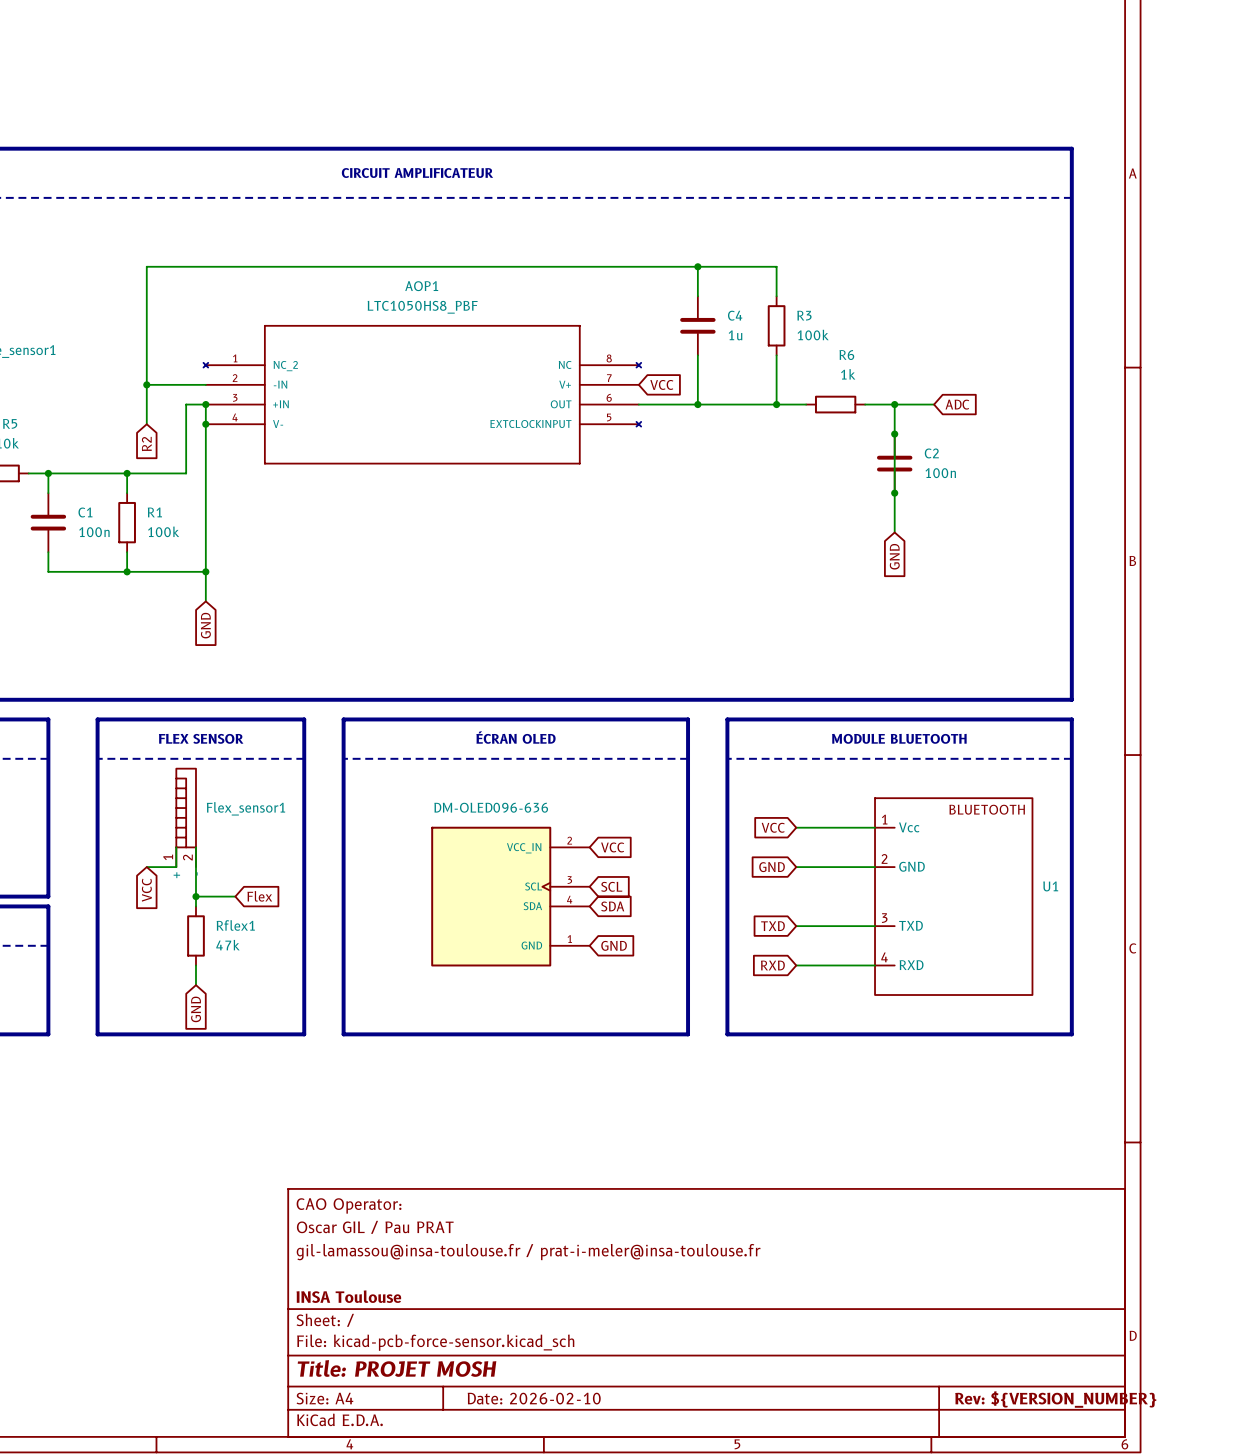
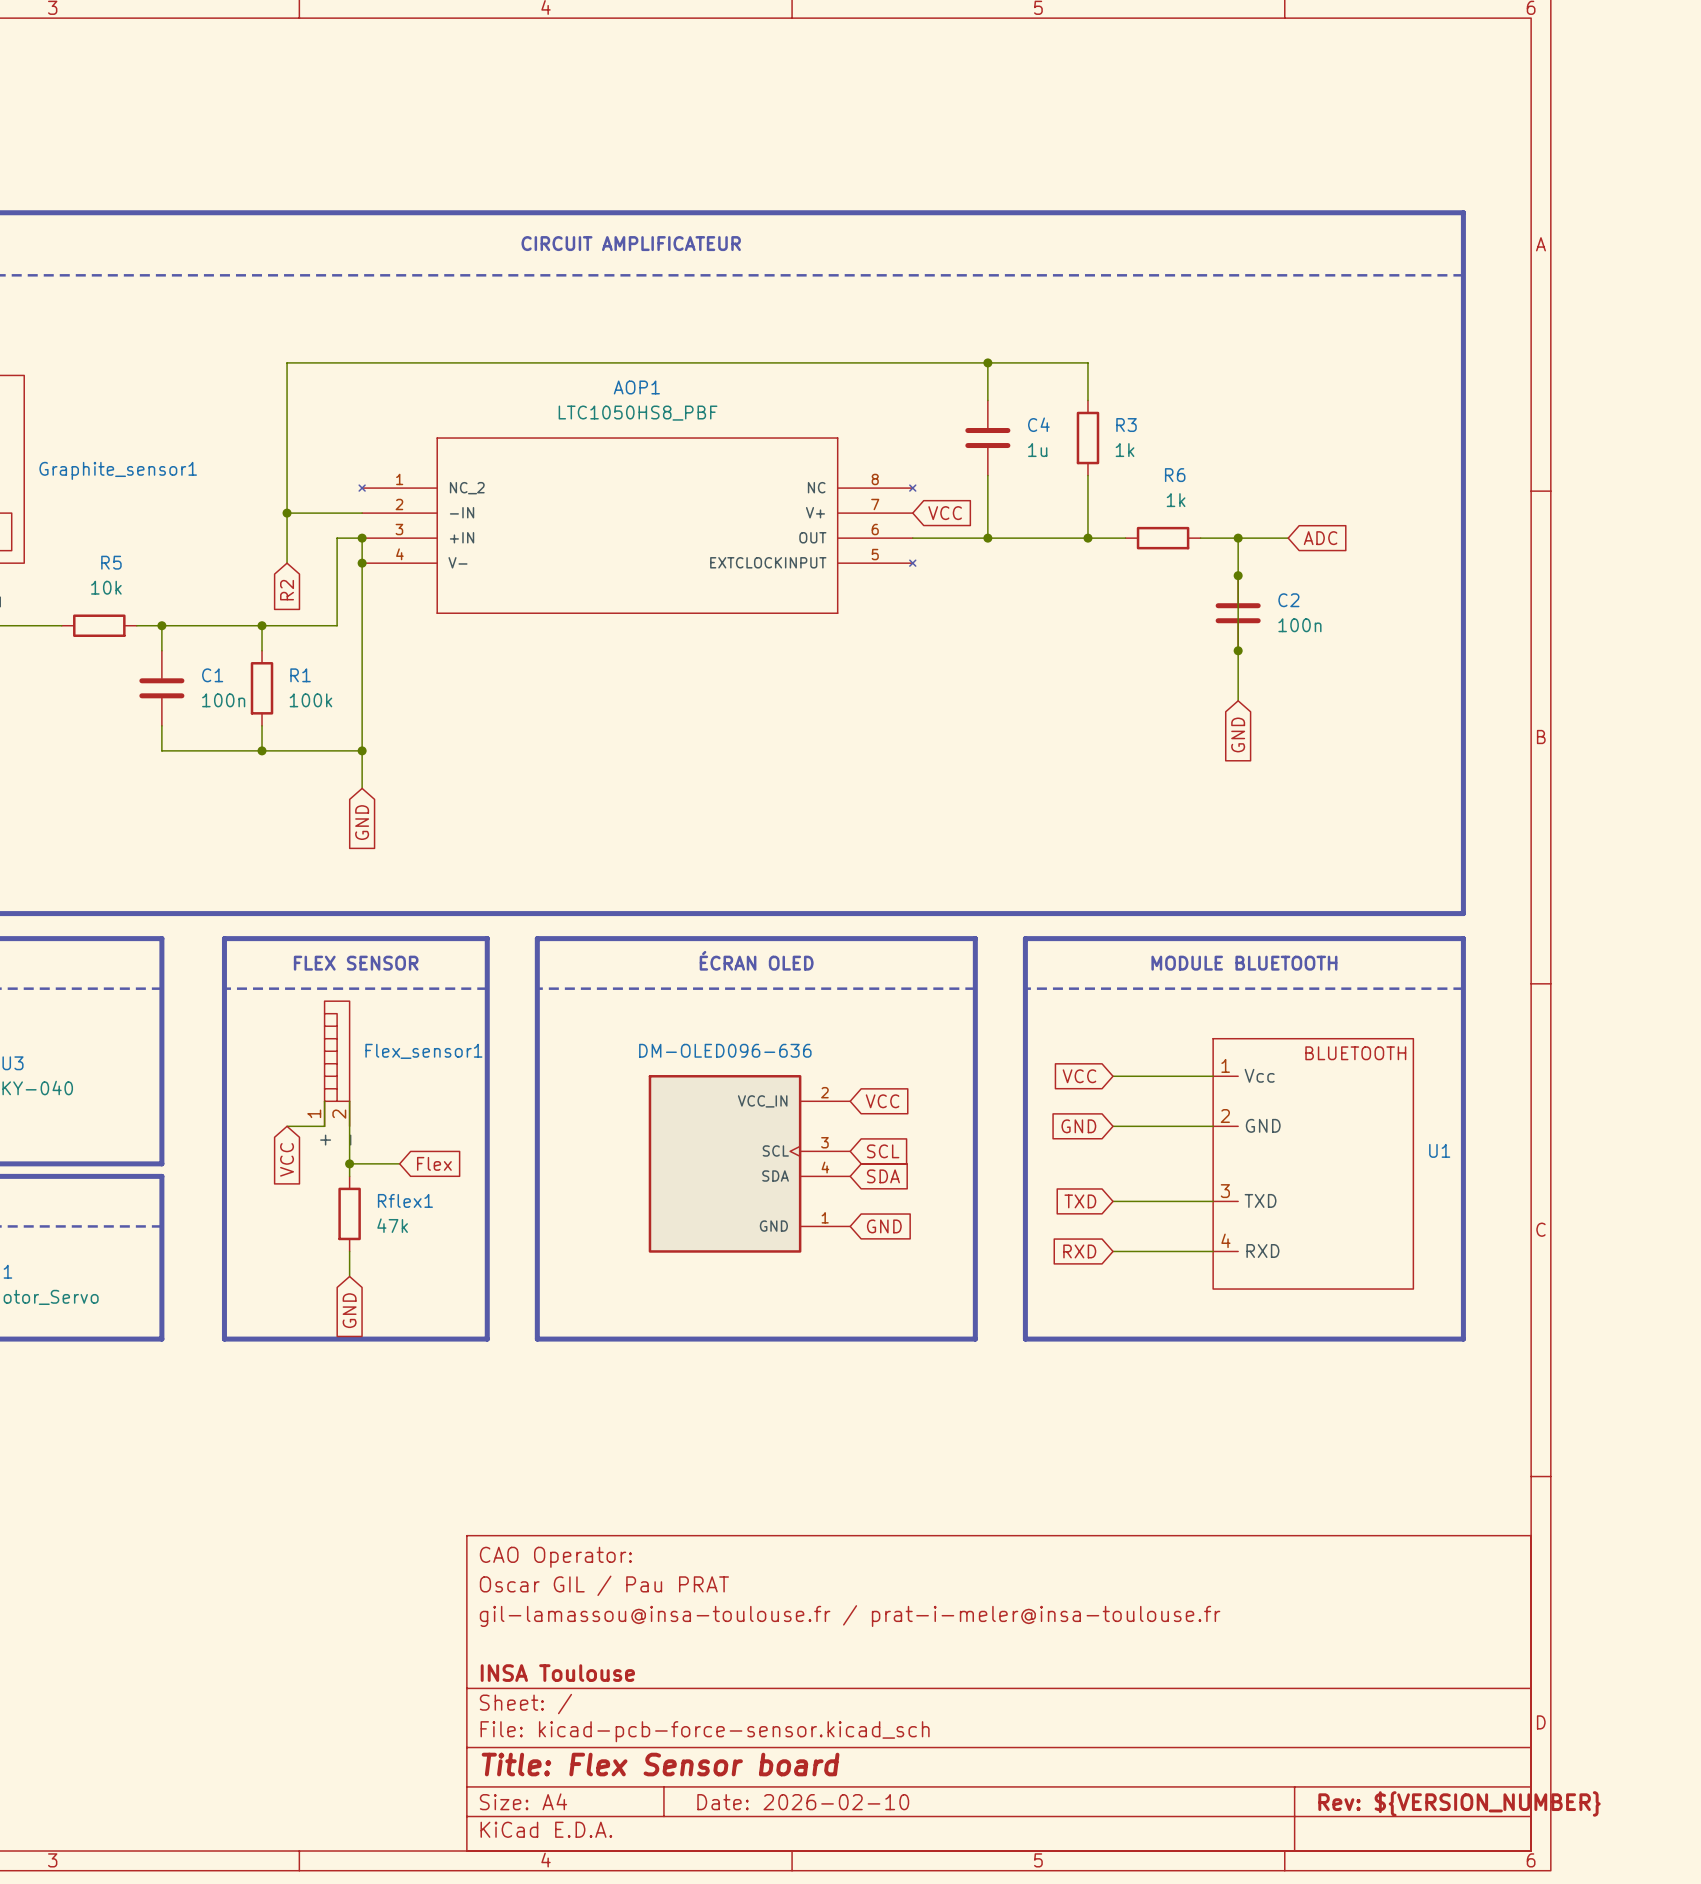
R3 value: 100k (813, 335) -> 1k (1125, 450)
title block: Title: PROJET MOSH (397, 1368) -> Title: Flex Sensor board (660, 1764)

